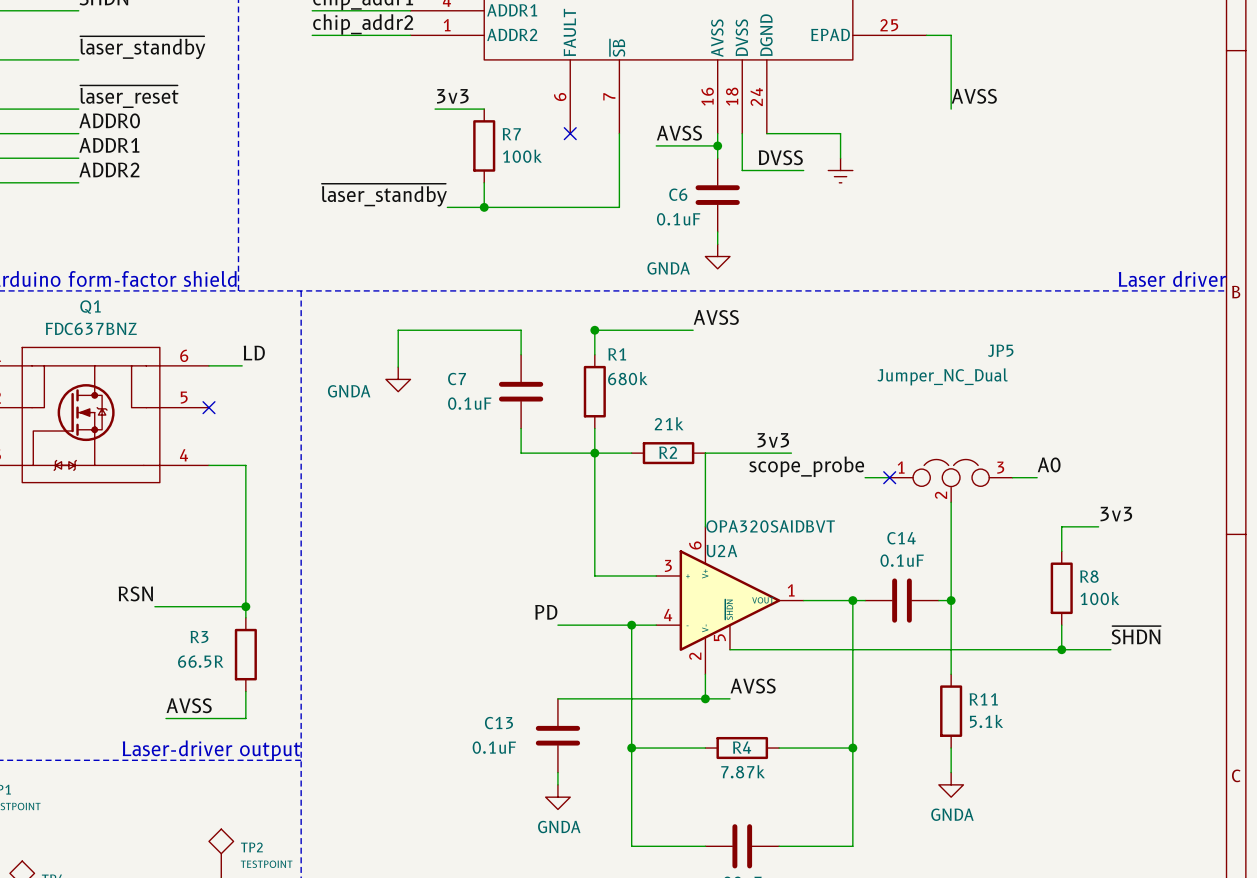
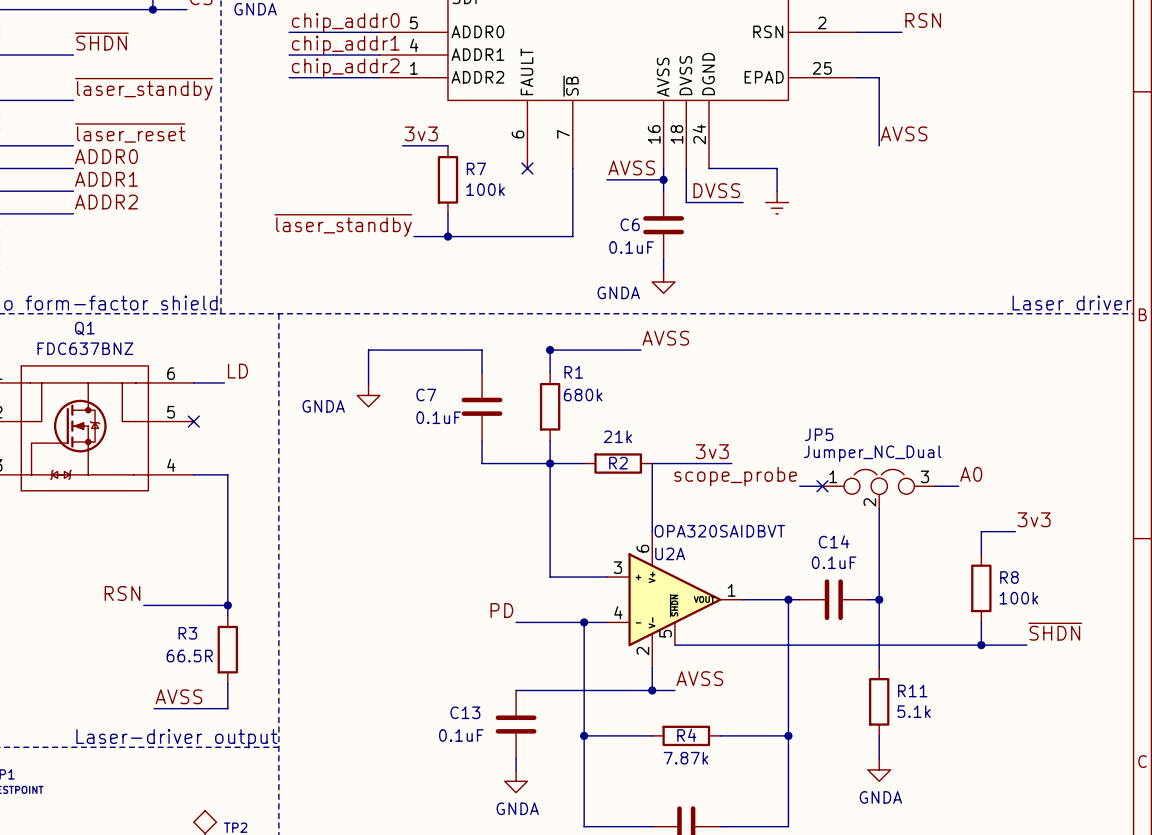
JP5 name position: JP5 (1000, 350) -> JP5 (819, 434)
JP5 value position: Jumper_NC_Dual (942, 376) -> Jumper_NC_Dual (872, 453)

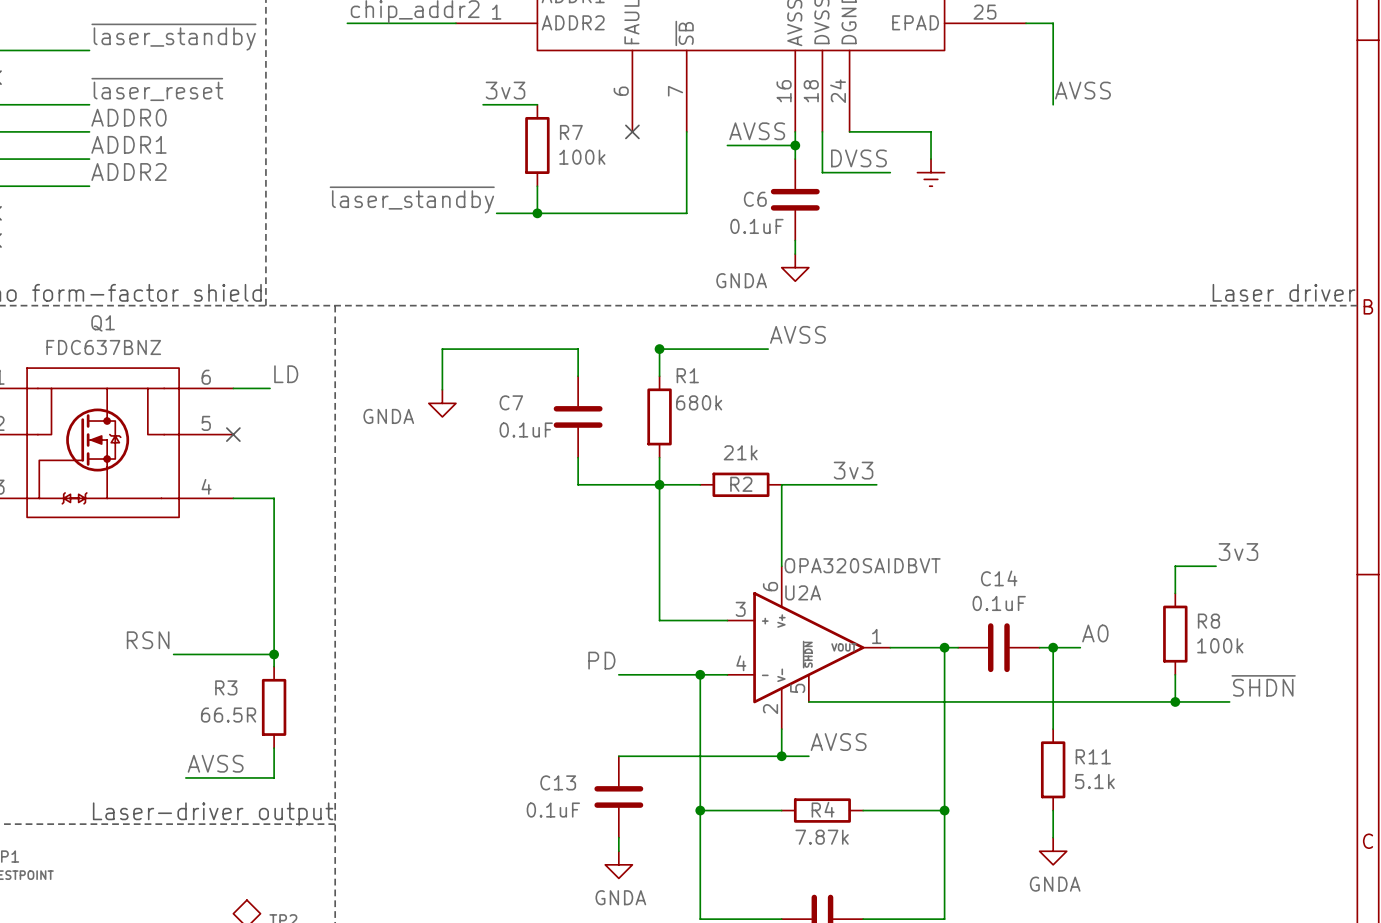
label position: A0 (971, 474) -> A0 (1095, 633)
label: scope_probe (735, 476) -> none
wire: (799, 486) (822, 486) -> none
no-connect mark: (822, 486) -> none
wire: (935, 486) (958, 486) -> none
JP5: Jumper_NC_Dual (879, 489) -> none
wire: (879, 508) (879, 599) -> (1080, 647) (1053, 647)

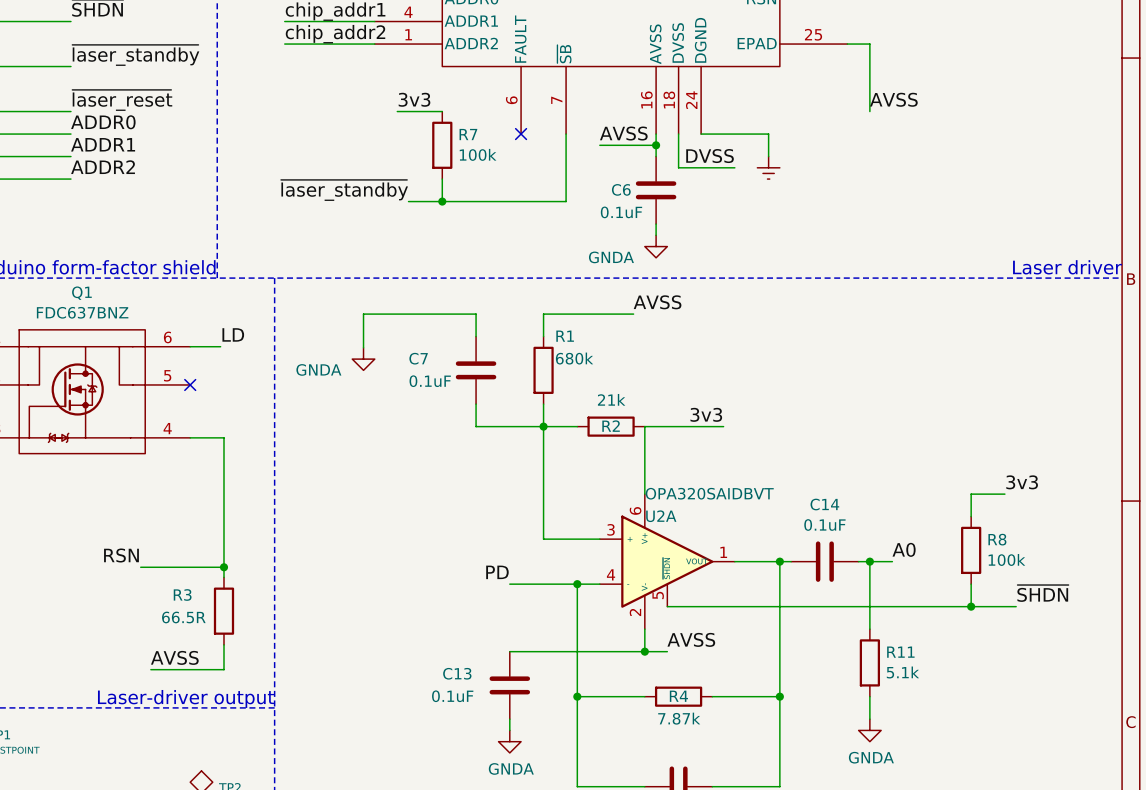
junction: (659, 349) -> none

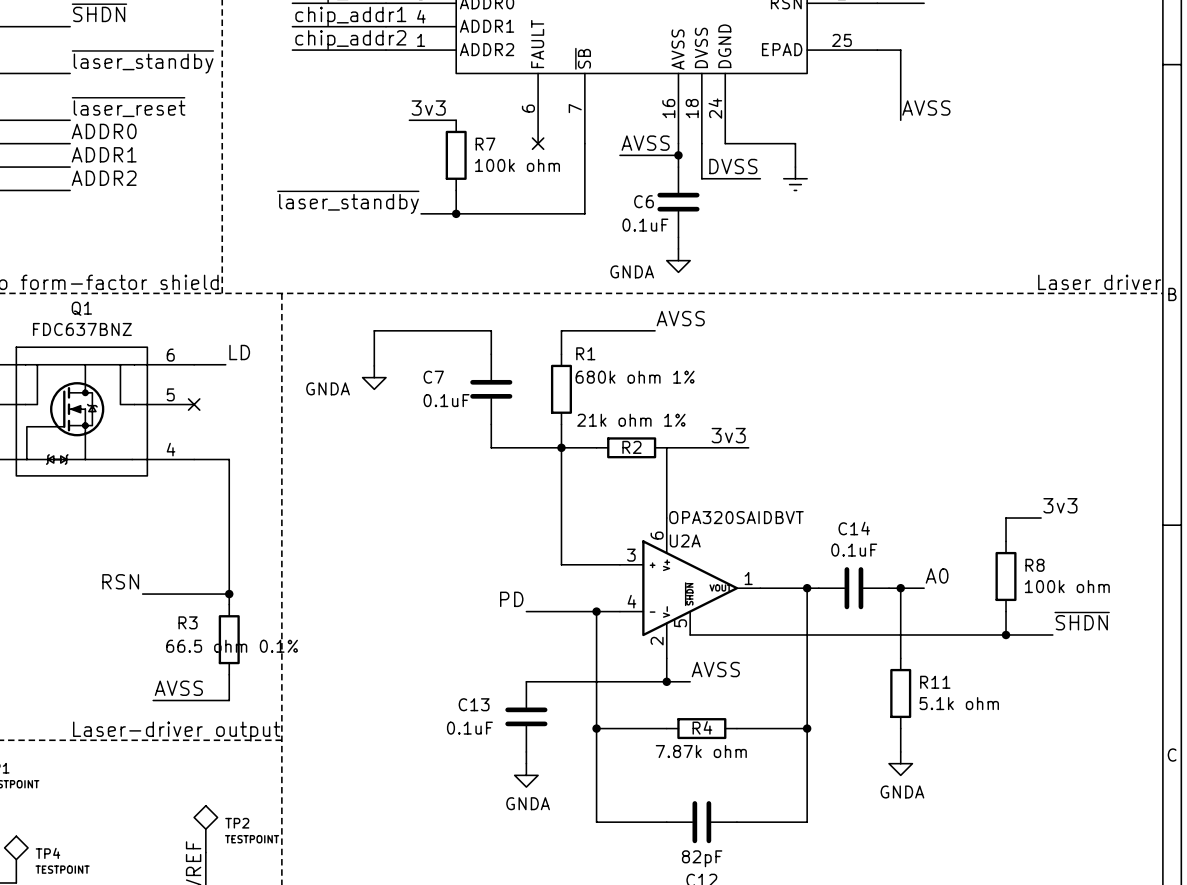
R7 value: 100k (478, 154) -> 100k ohm (517, 165)
R1 value: 680k (574, 358) -> 680k ohm 1% (635, 377)
R2 value: 21k (611, 399) -> 21k ohm 1% (631, 420)
R8 value: 100k (1006, 559) -> 100k ohm (1067, 586)
R3 value: 66.5R (183, 617) -> 66.5 ohm 0.1% (232, 646)
R11 value: 5.1k (902, 672) -> 5.1k ohm (959, 703)
R4 value: 7.87k (679, 718) -> 7.87k ohm (701, 751)

